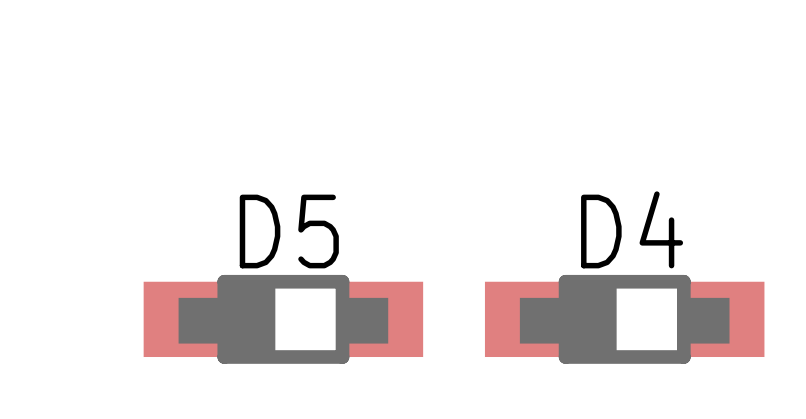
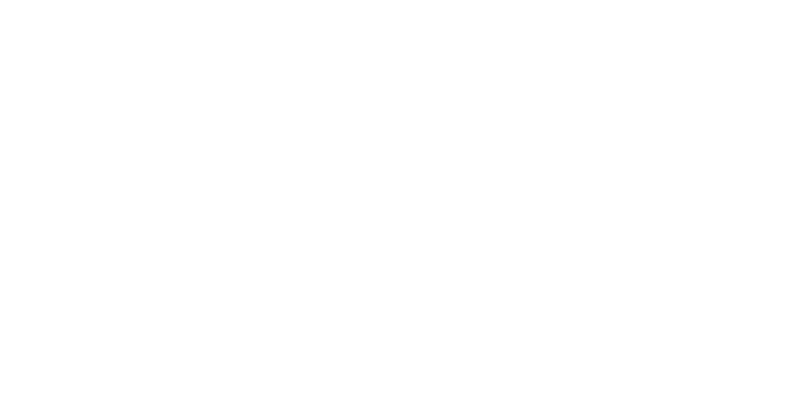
D5: (283, 319) -> none
D4: (624, 319) -> none

